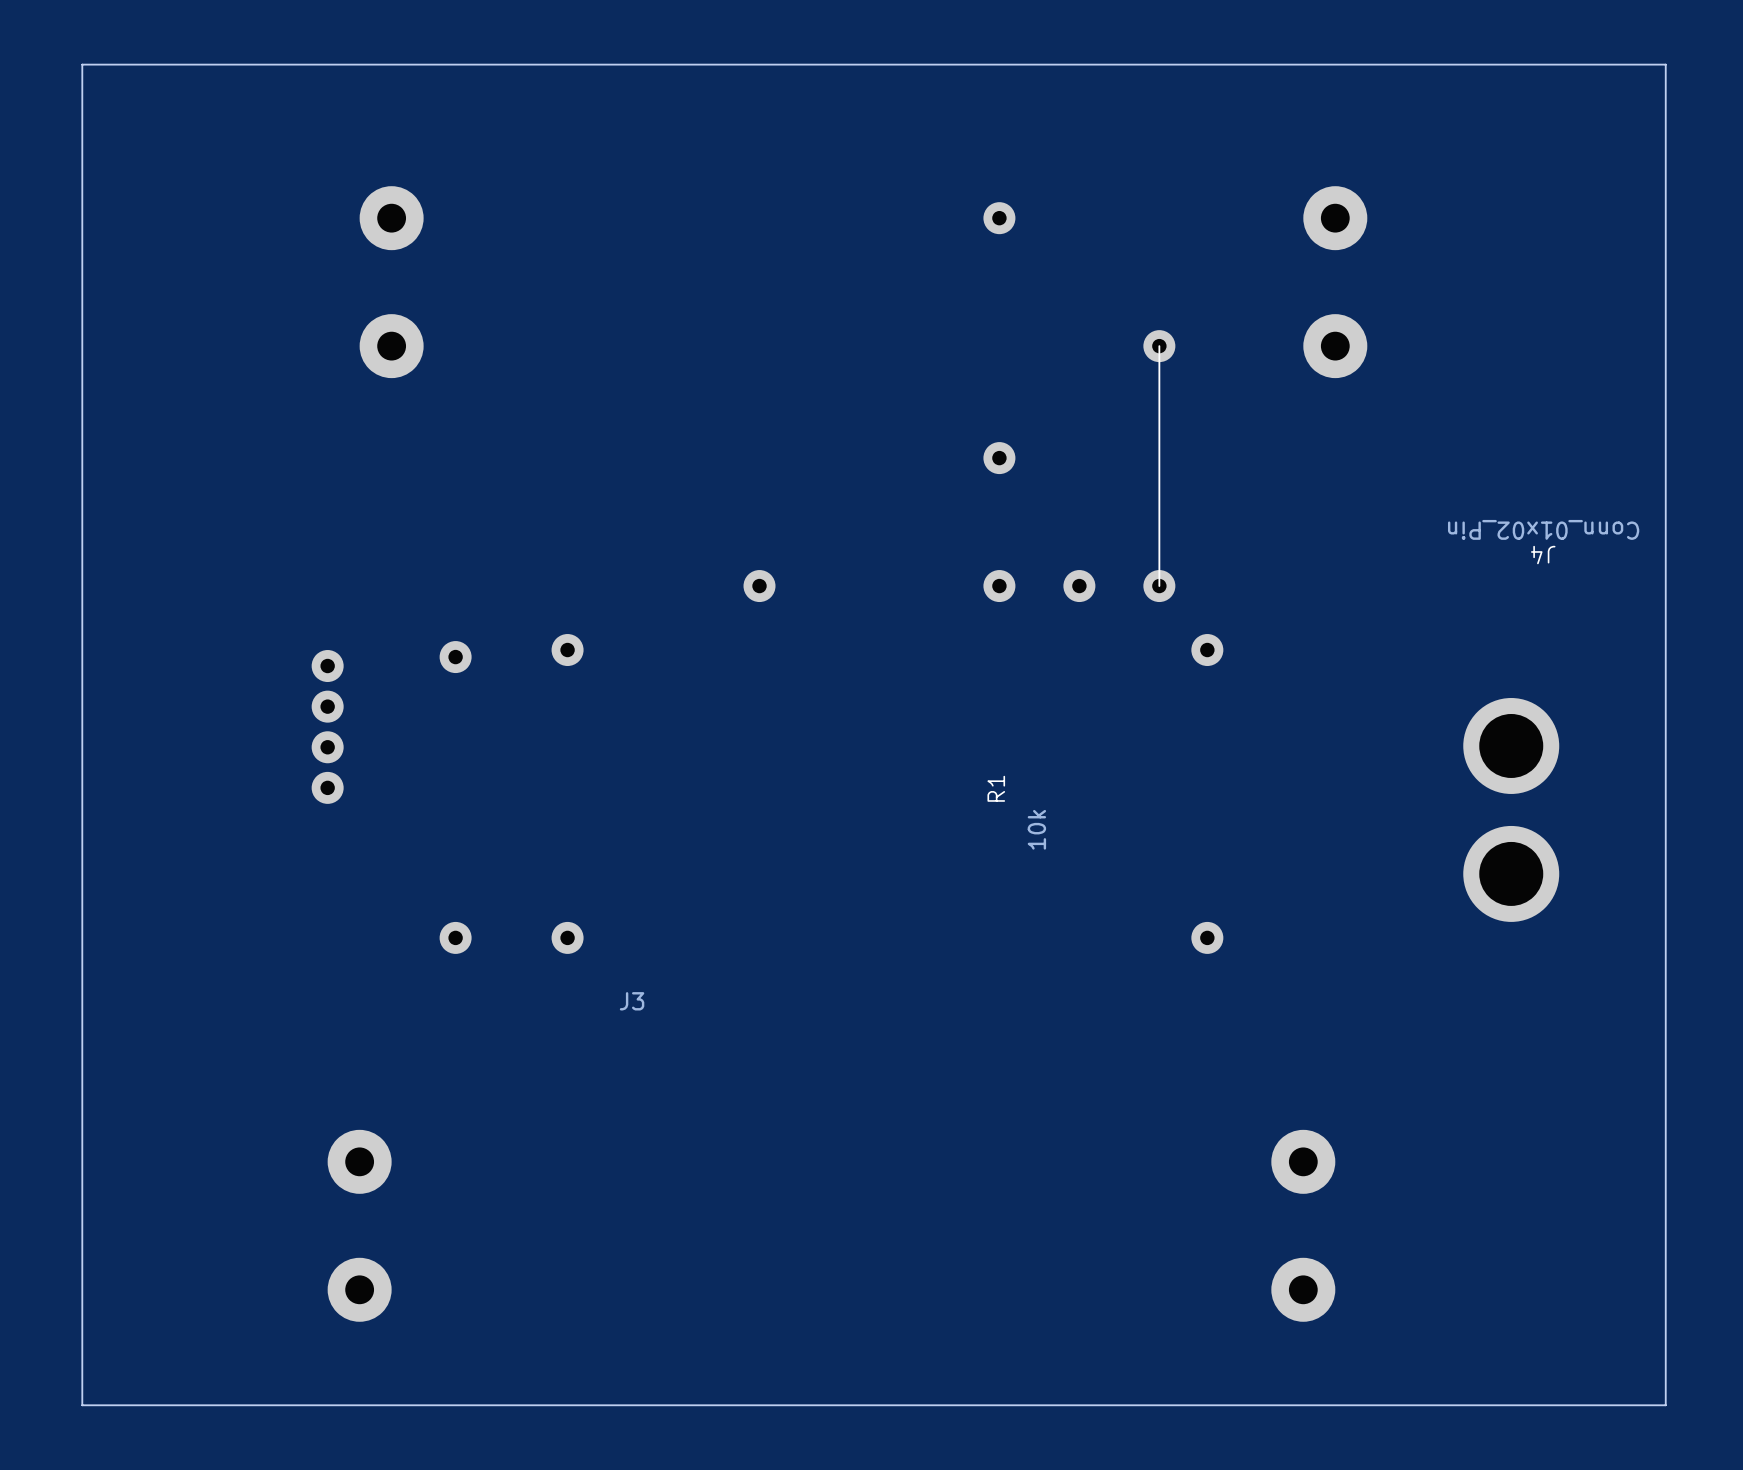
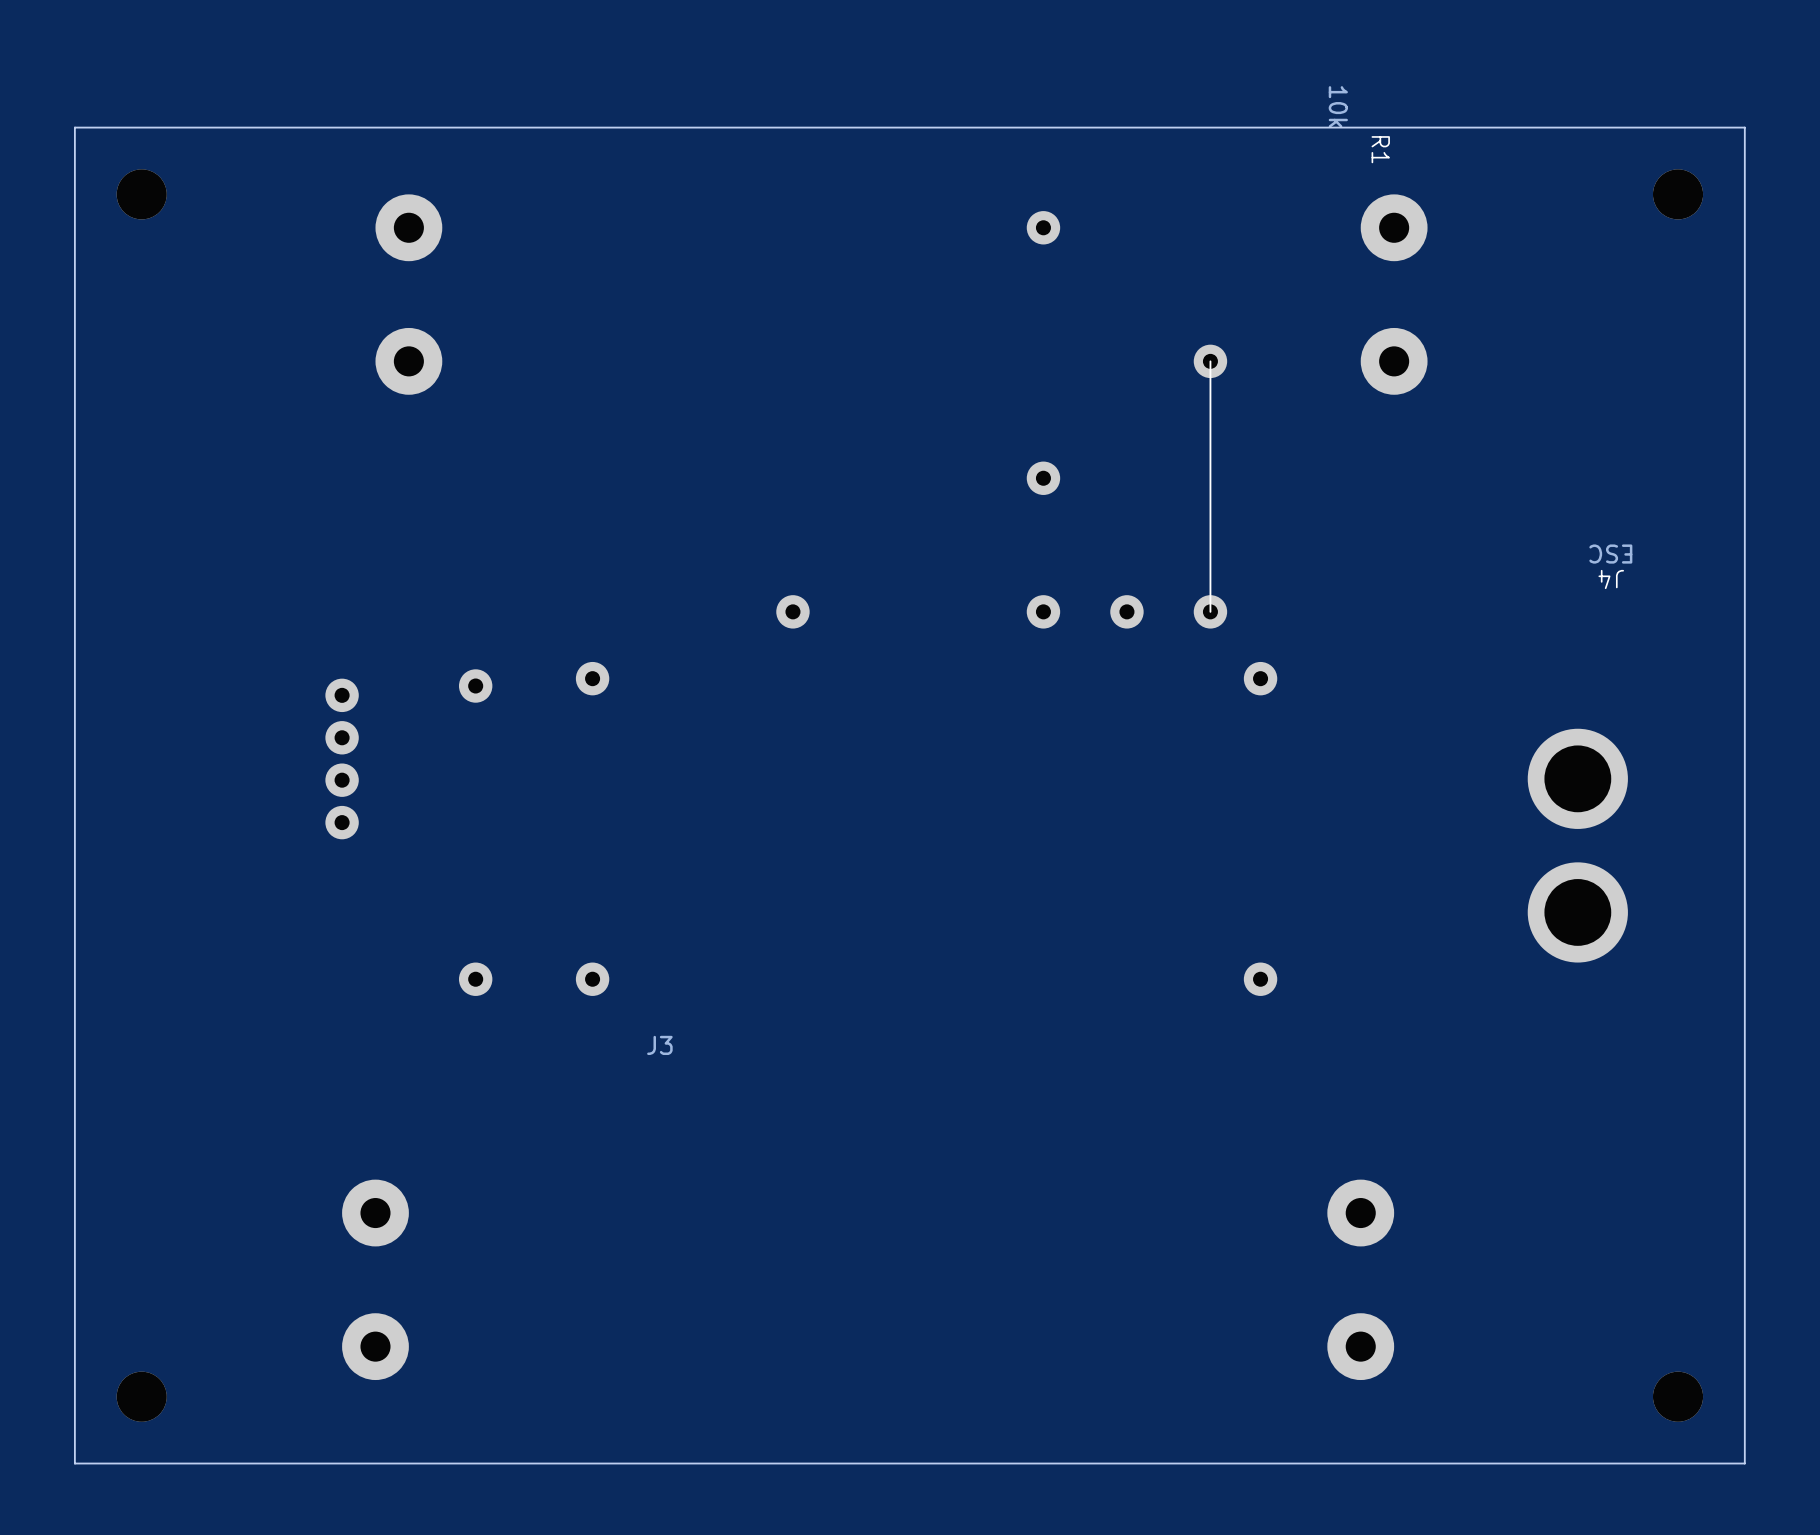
board edge: (1665, 64) (82, 64) (82, 1405) (1665, 1405) (1665, 64) -> (1744, 127) (1744, 1463) (74, 1463) (74, 127) (1744, 127)
part: none -> (141, 194)
part: none -> (1678, 194)
J4 value: Conn_01x02_Pin (1543, 529) -> ESC (1610, 554)
R1 name rotation: 0° (996, 788) -> 180° (1380, 149)
R1 name position: R1 (996, 788) -> R1 (1380, 149)
R1 value rotation: 0° (1036, 829) -> 180° (1338, 106)
R1 value position: 10k (1036, 829) -> 10k (1338, 106)
part: none -> (141, 1396)
part: none -> (1678, 1396)

